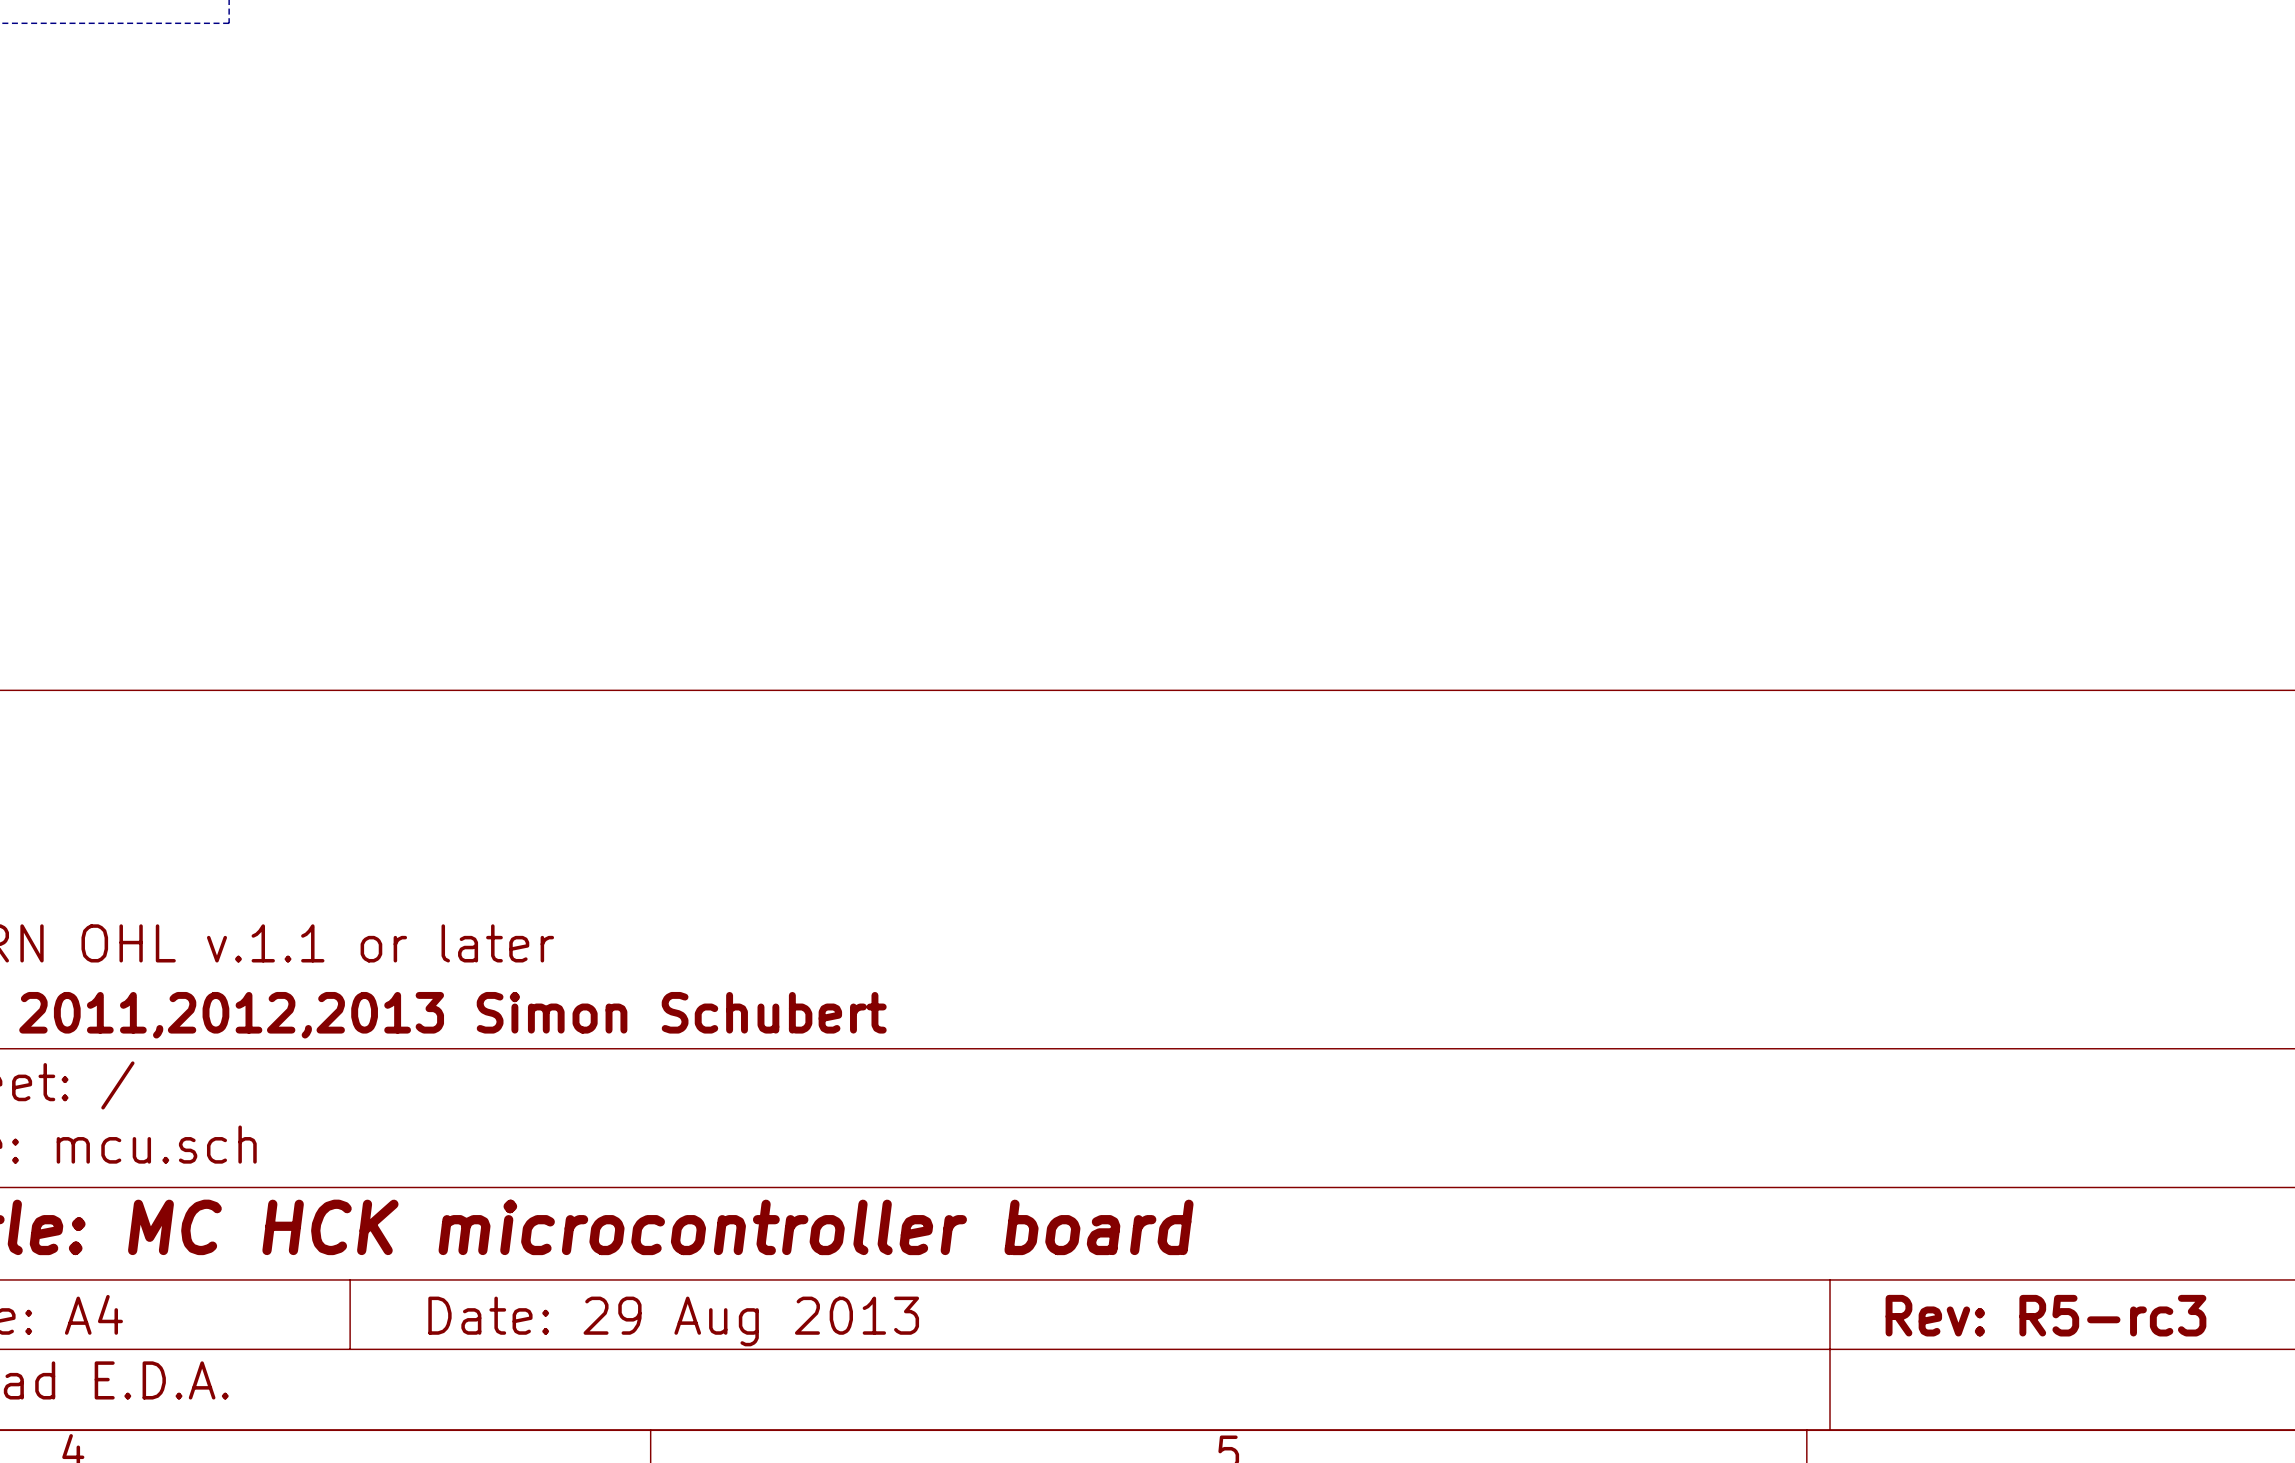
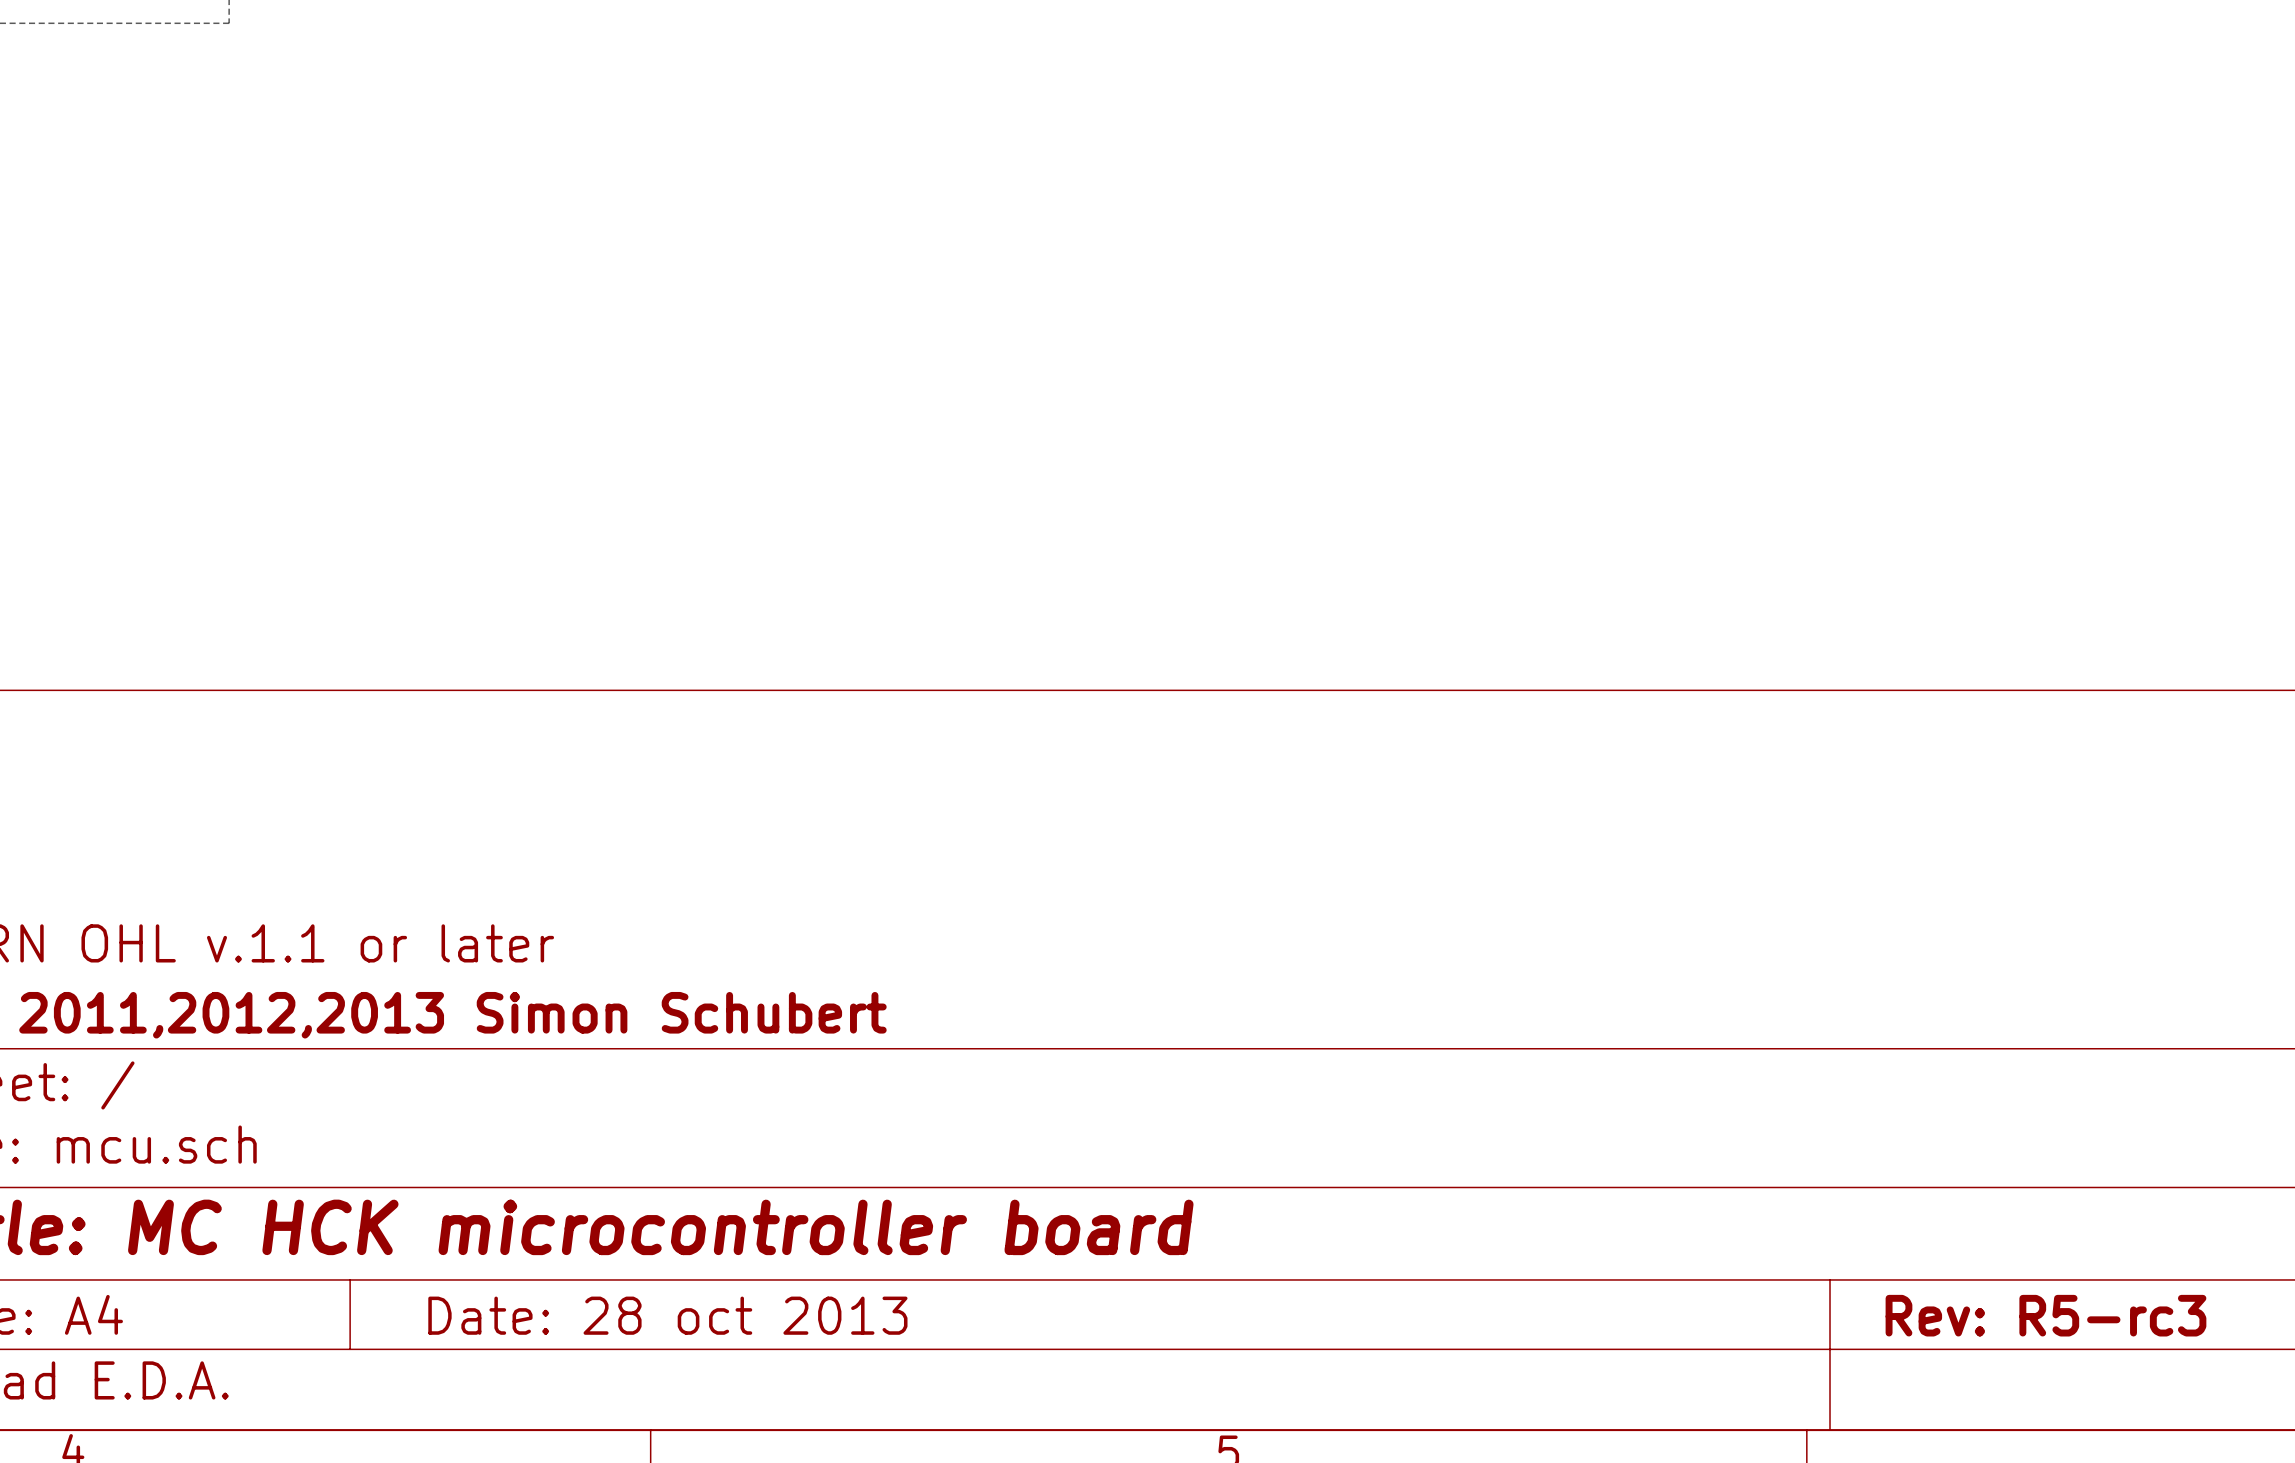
title block: Date: 29 Aug 2013 (673, 1321) -> Date: 28 oct 2013 (667, 1315)

